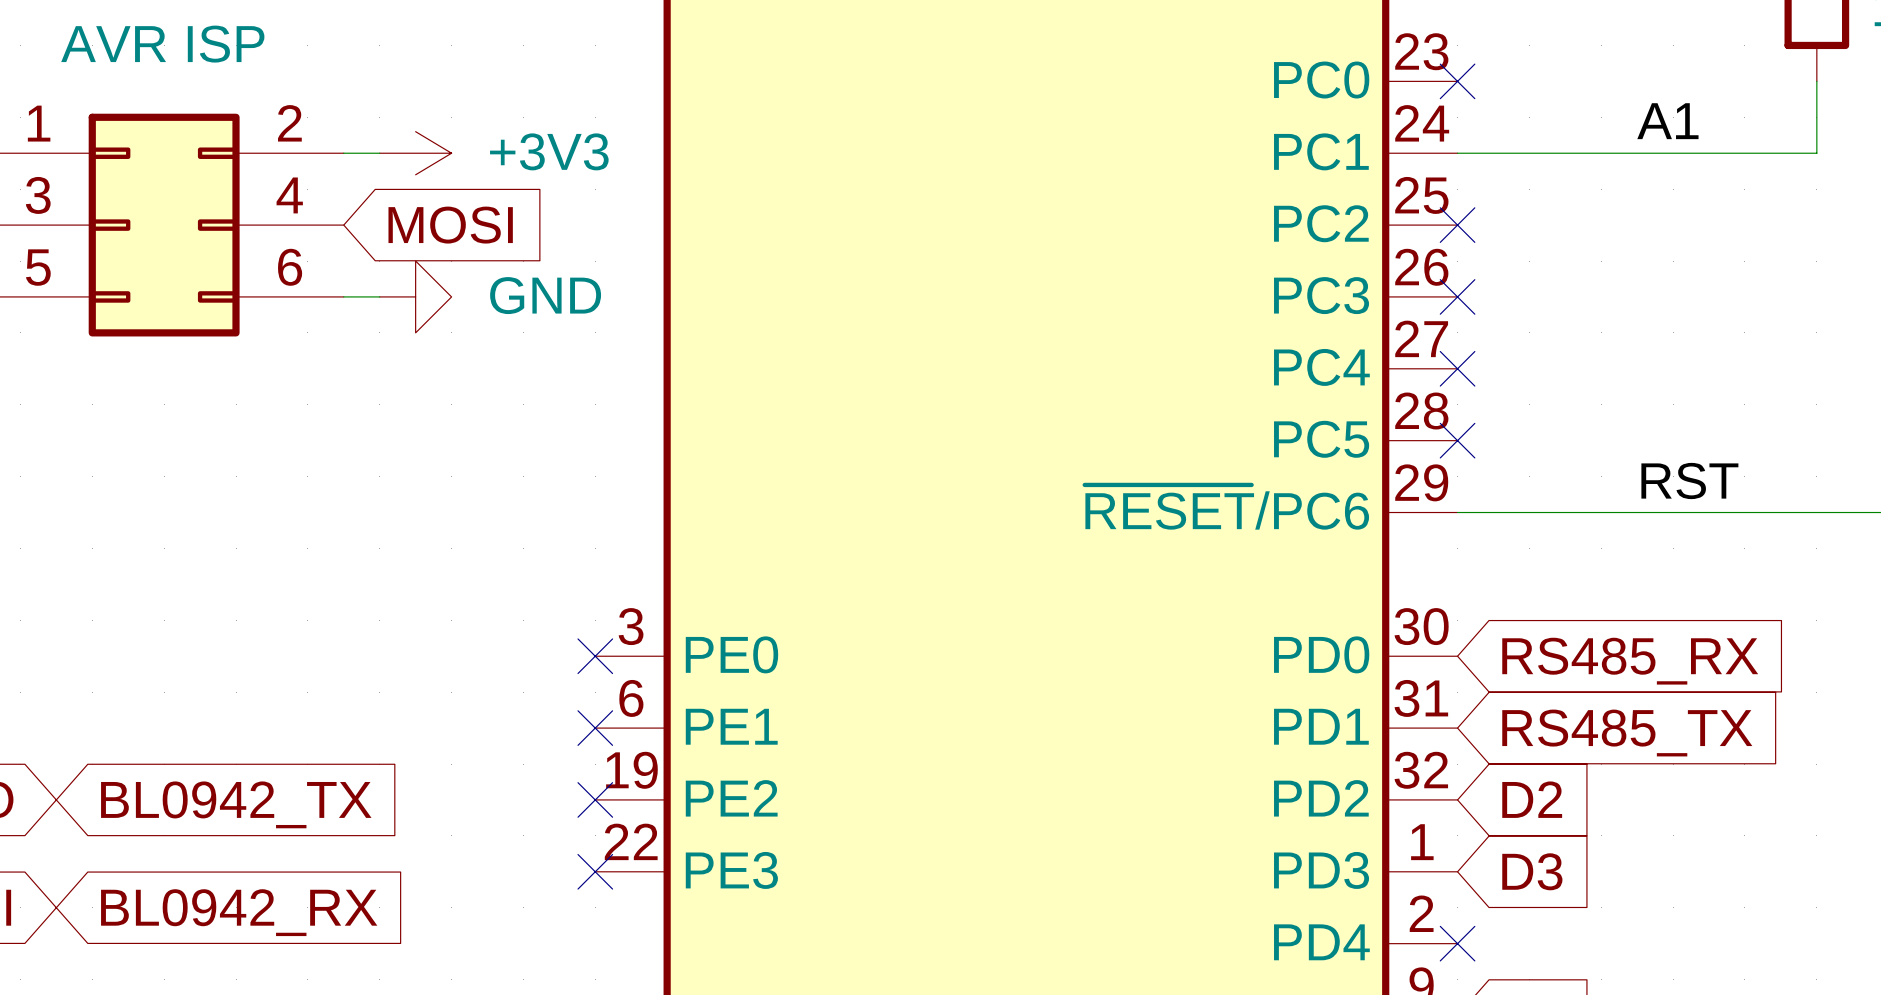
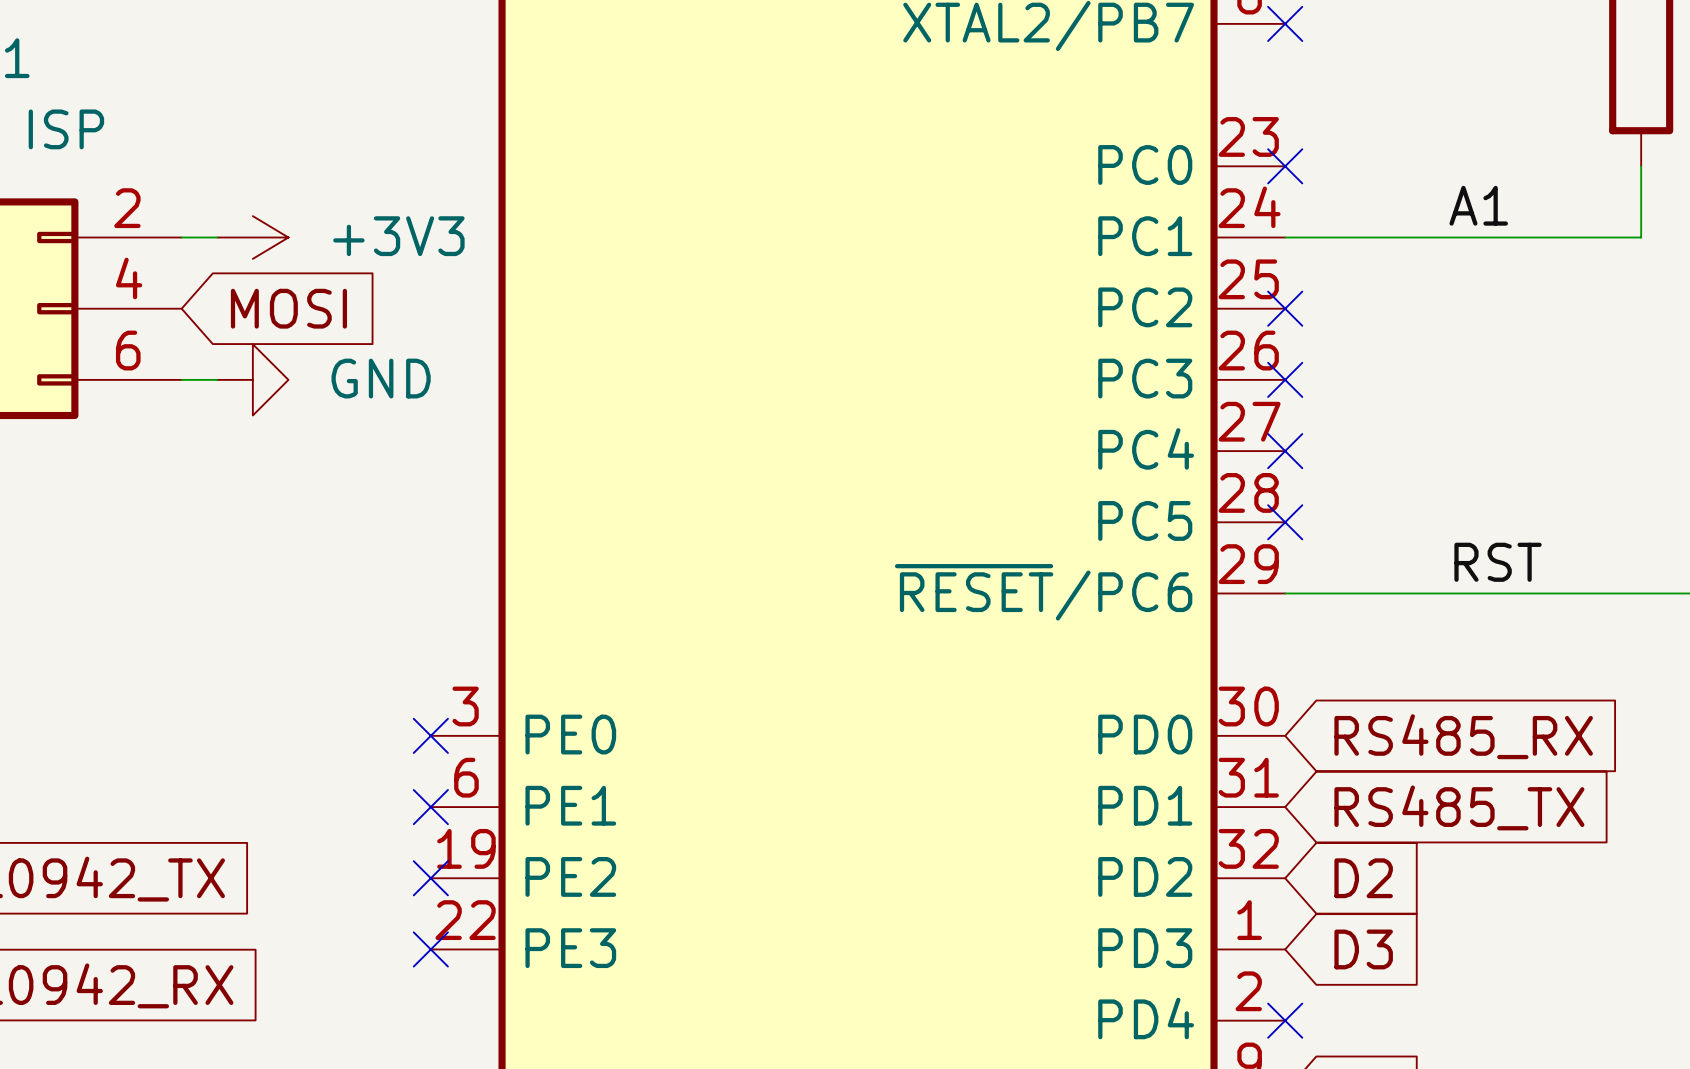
label position: A1 (1667, 121) -> A1 (1478, 205)
label position: RST (1689, 480) -> RST (1498, 562)

